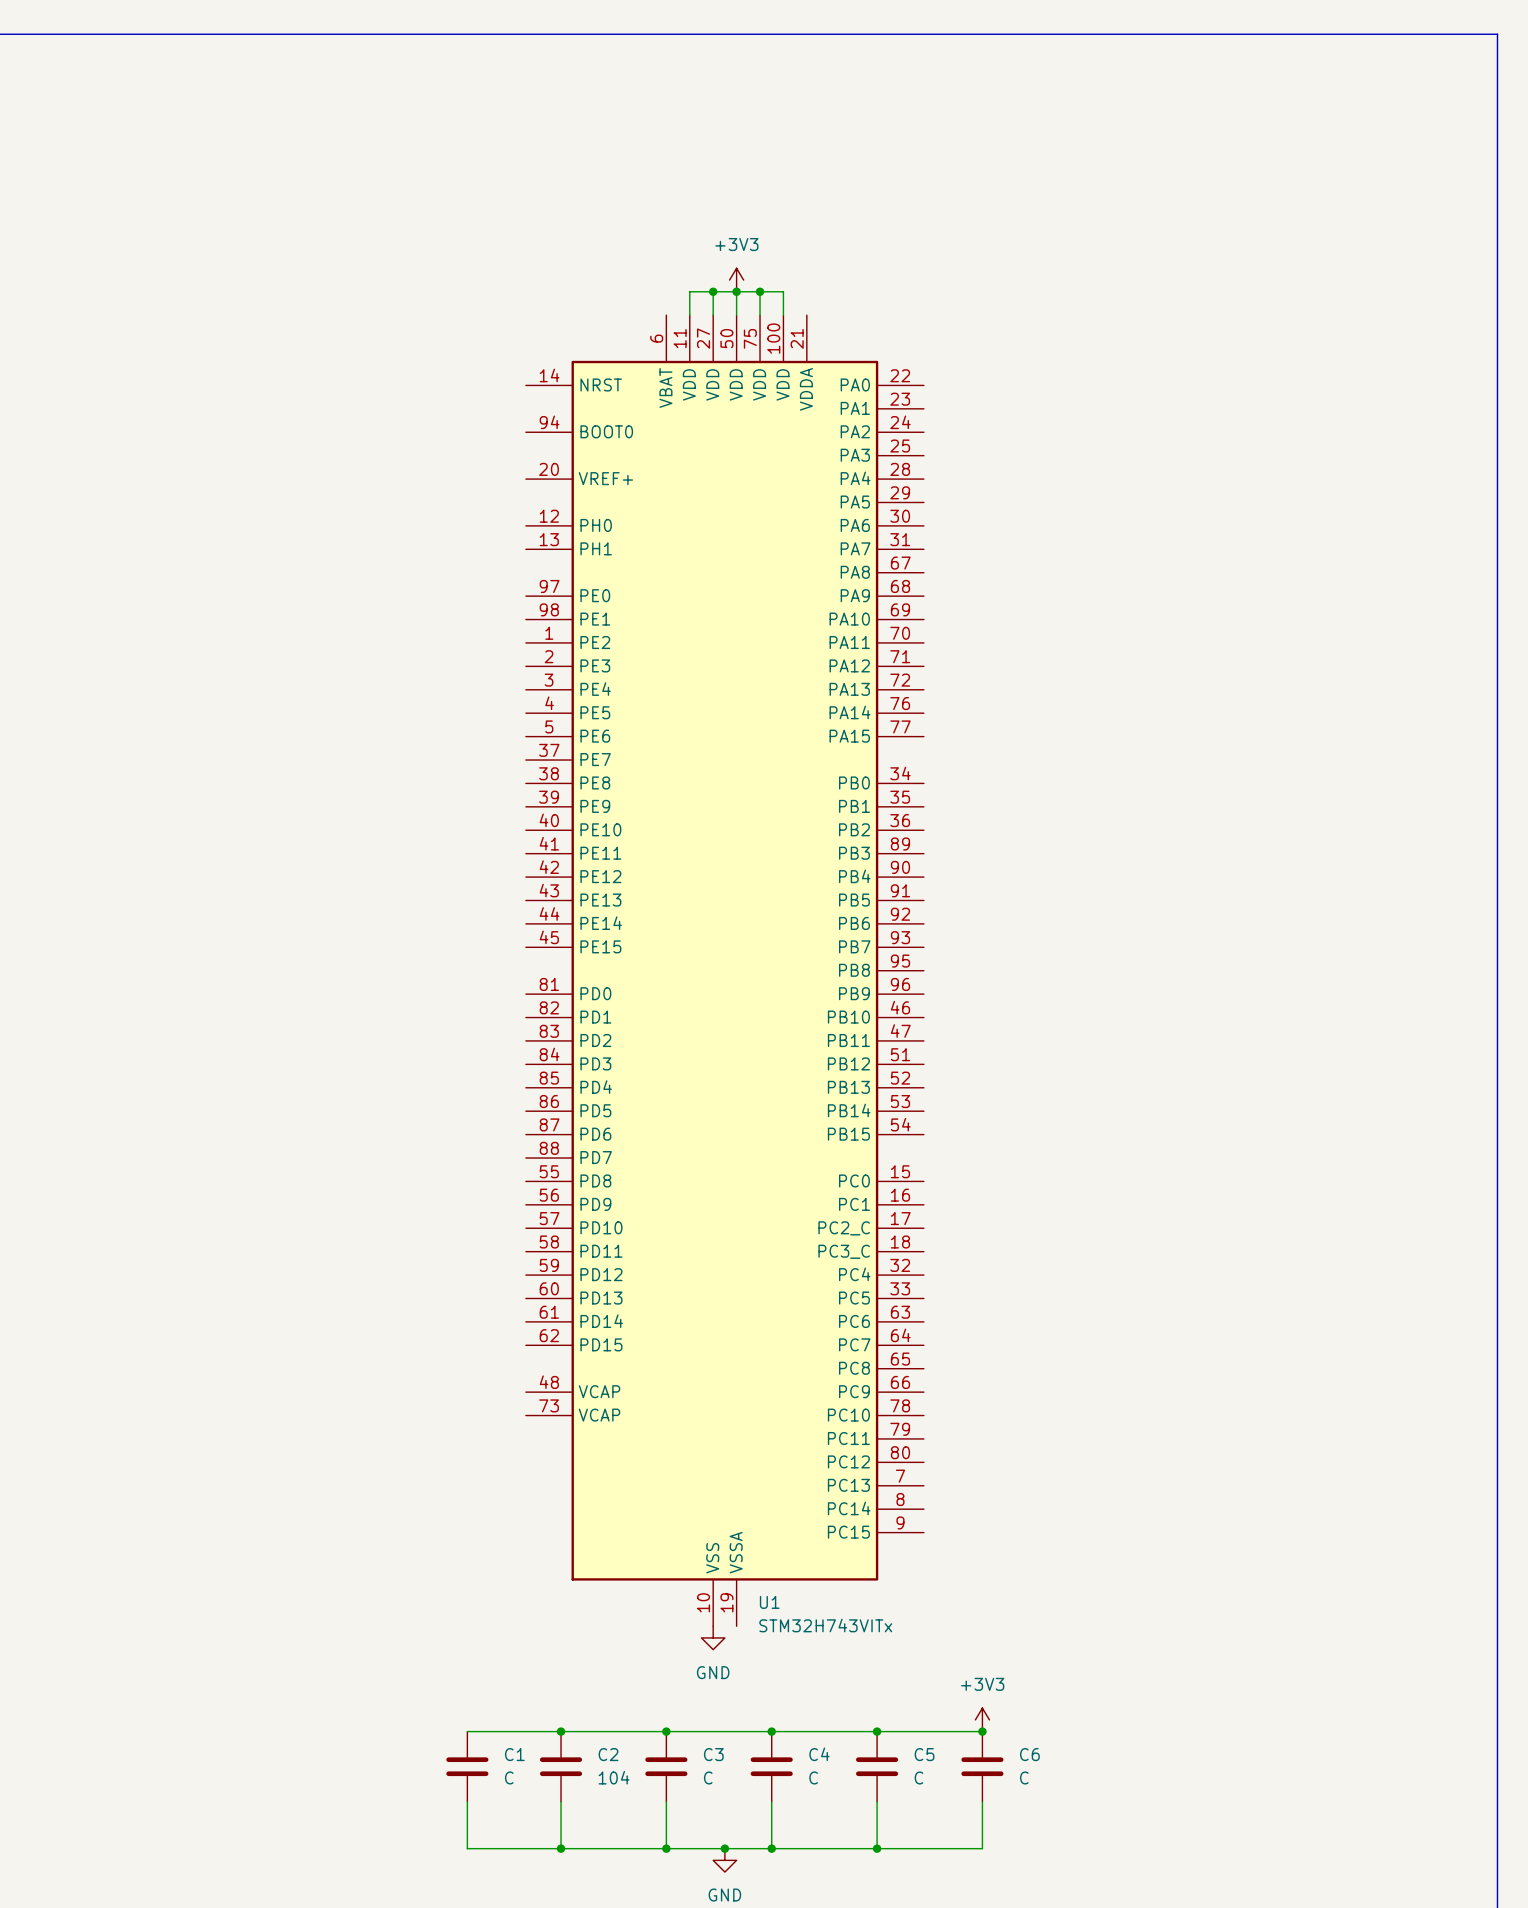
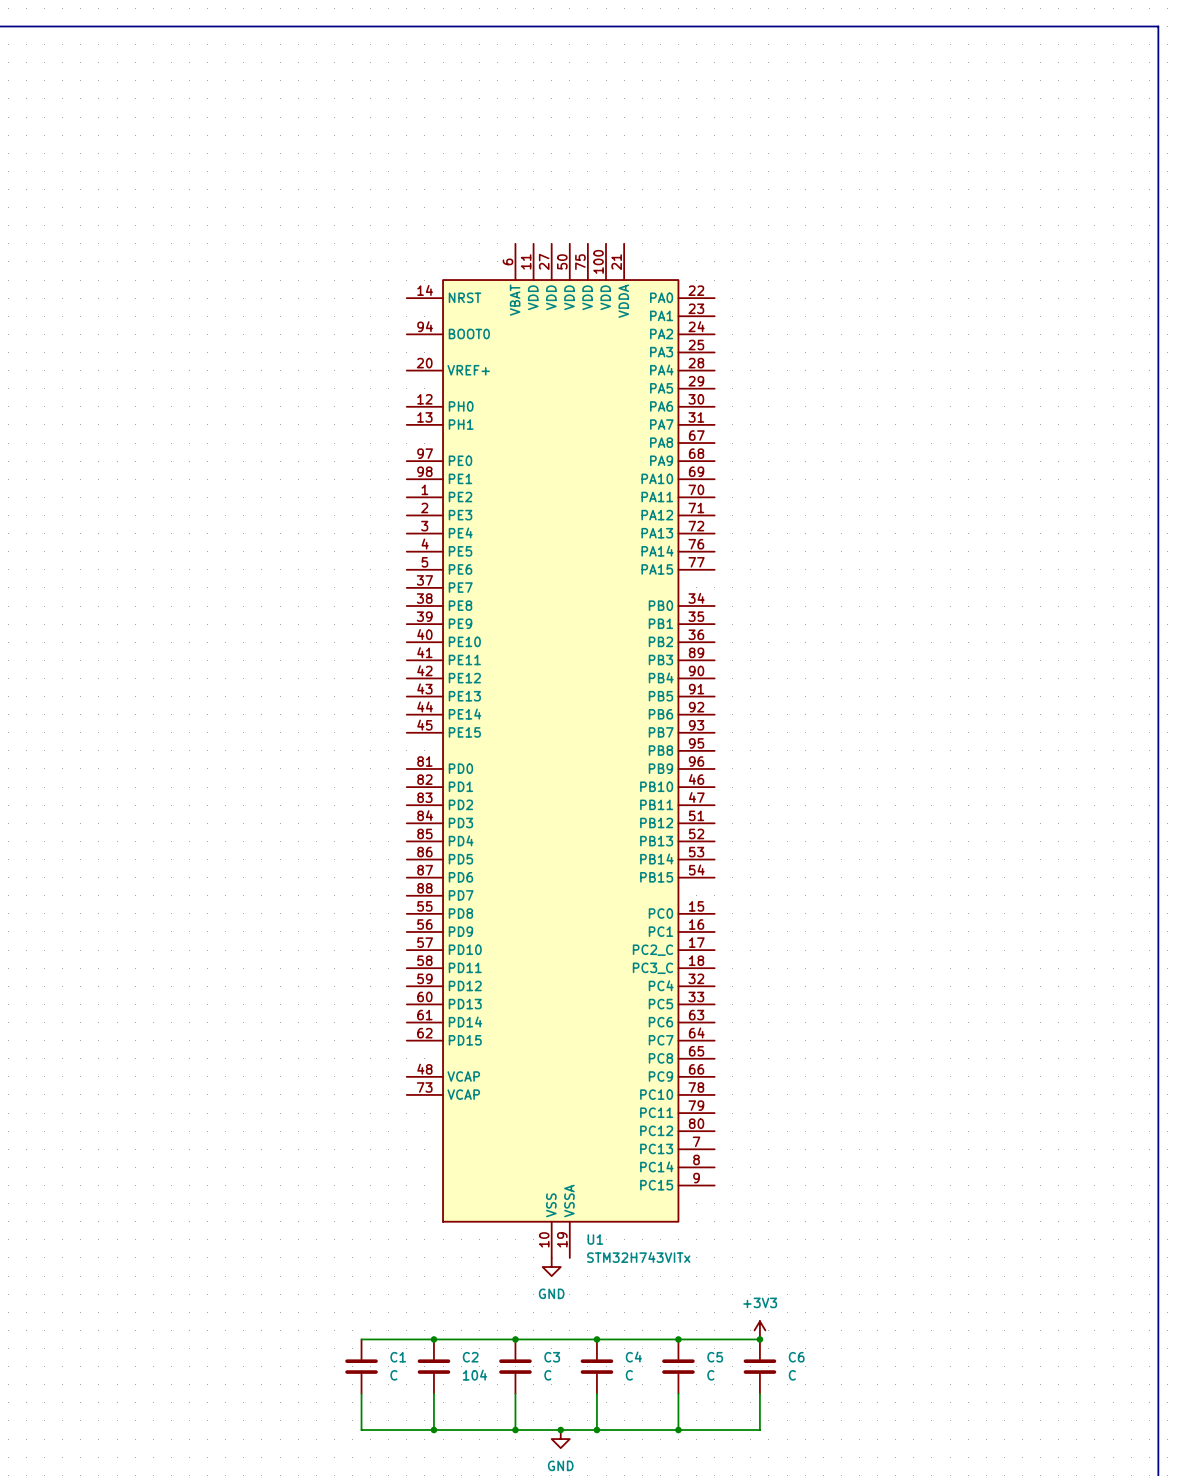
power symbol: +3V3 (736, 280) -> none
wire: (713, 291) (713, 315) -> none
junction: (713, 291) -> none
wire: (736, 291) (736, 315) -> none
junction: (736, 291) -> none
wire: (760, 291) (760, 315) -> none
junction: (760, 291) -> none
wire: (689, 315) (689, 291) (783, 291) (783, 315) -> none

